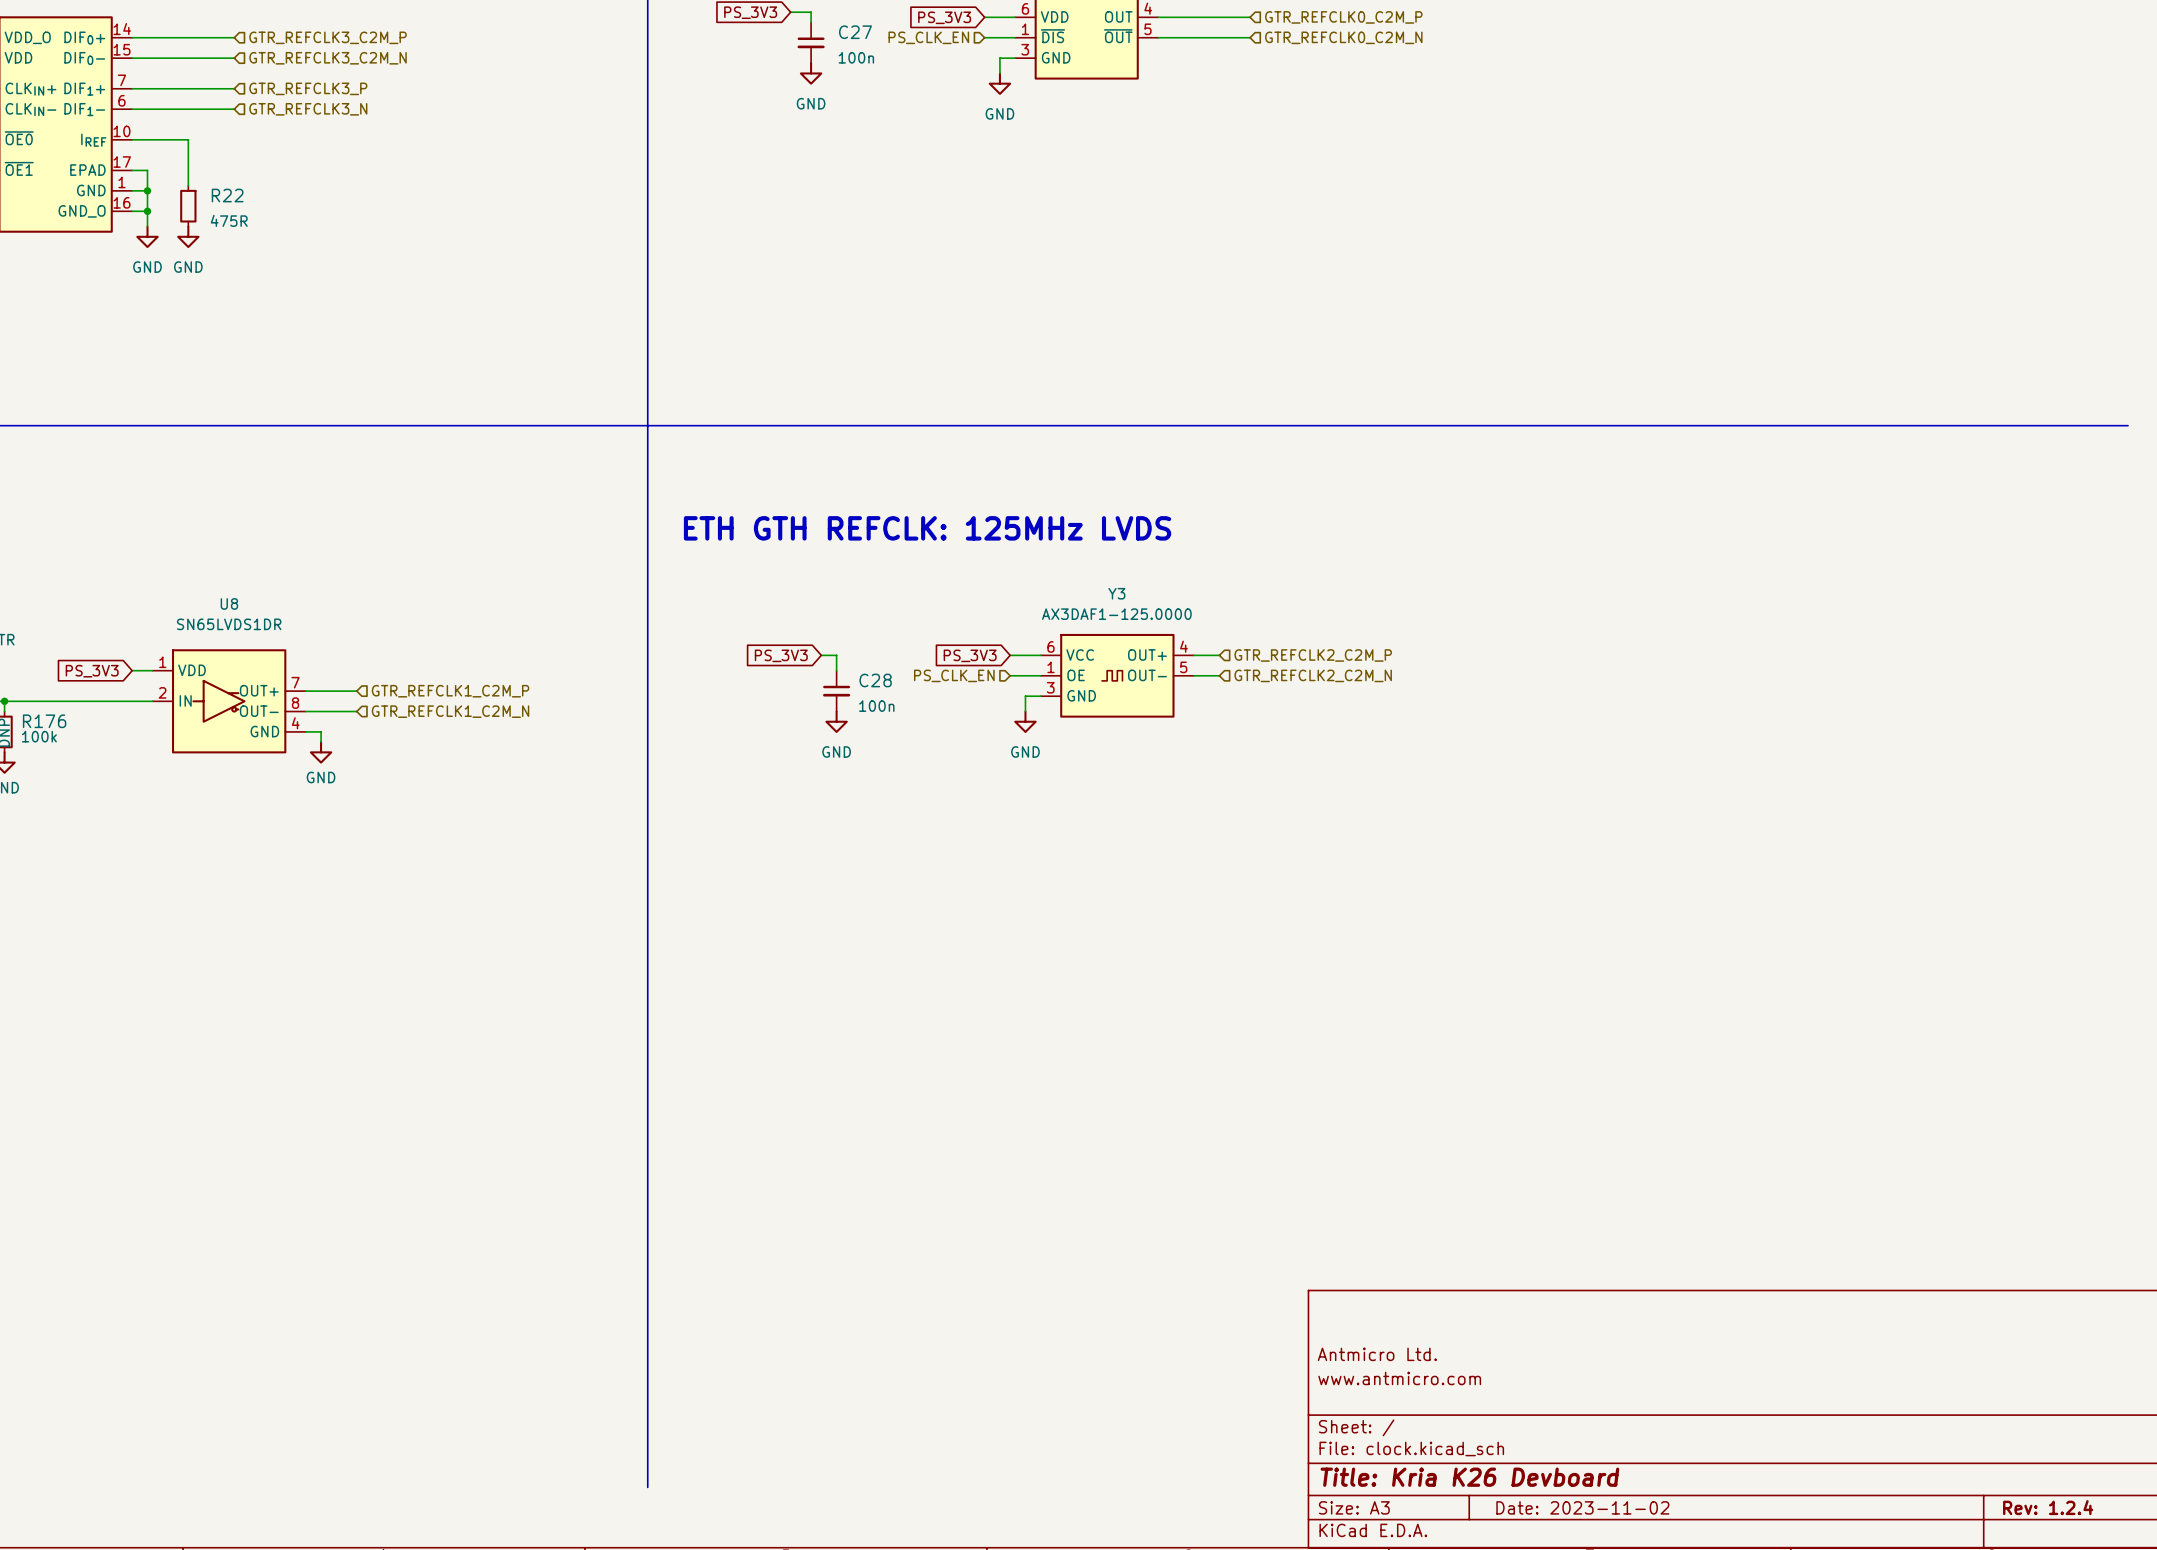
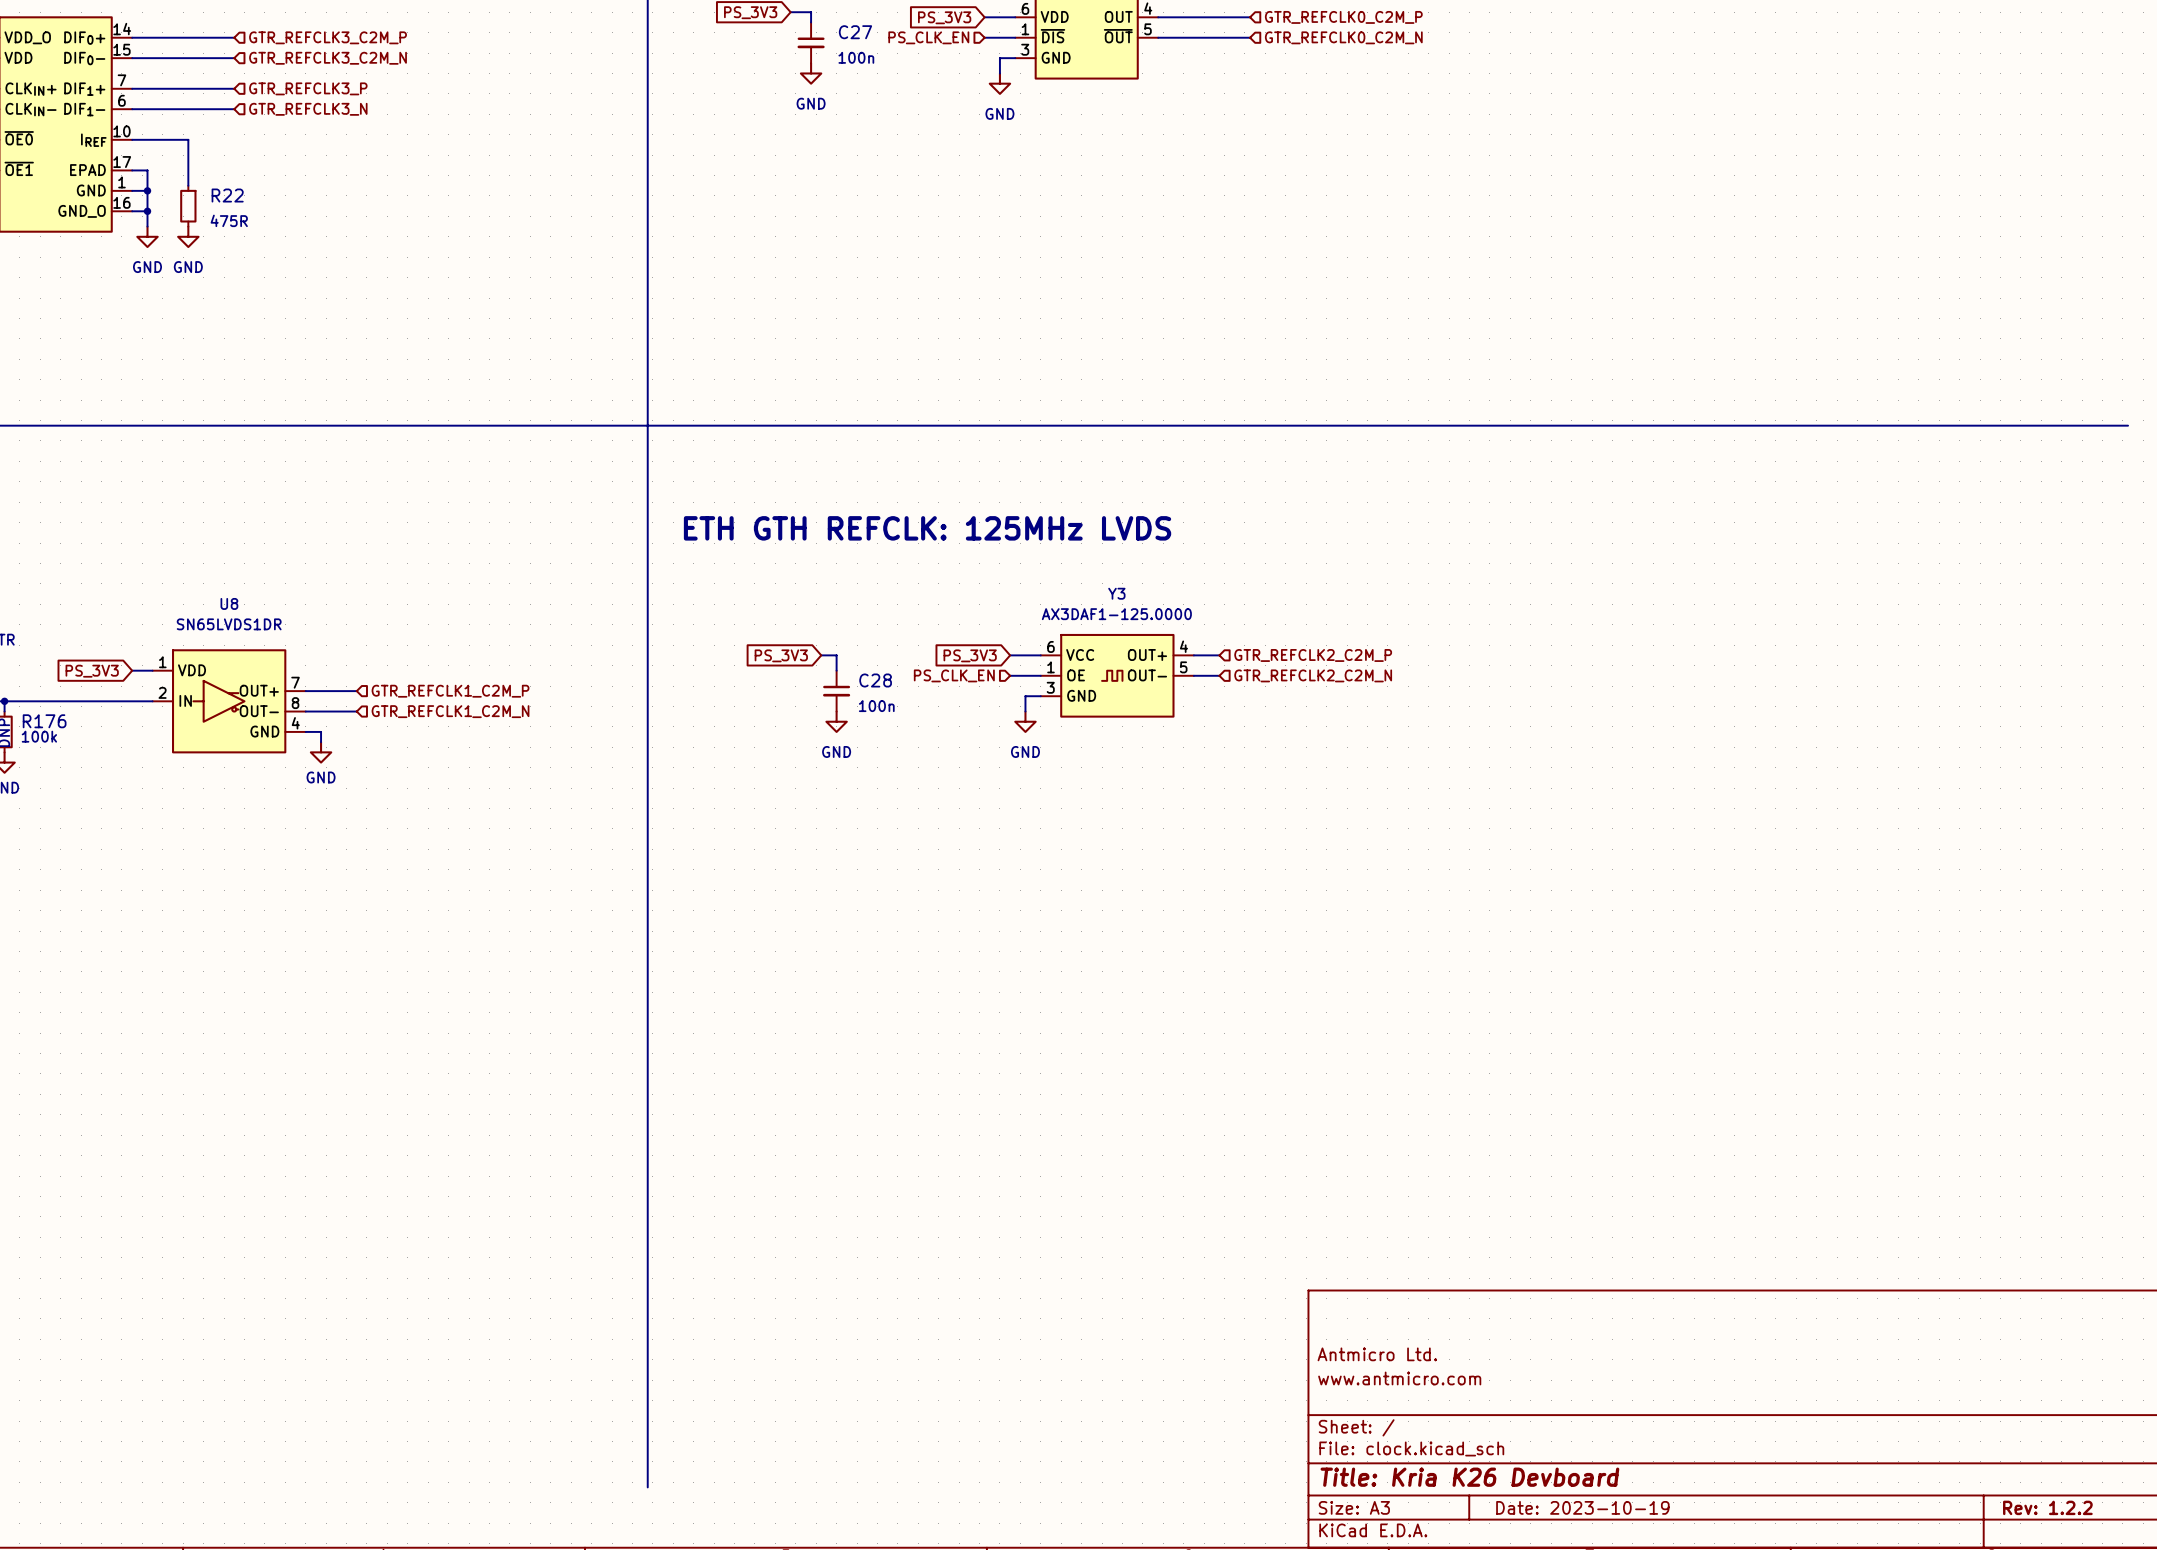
title block: Date: 2023-11-02 (1582, 1507) -> Date: 2023-10-19 (1582, 1507)
title block: Rev: 1.2.4 (2048, 1507) -> Rev: 1.2.2 (2047, 1507)

